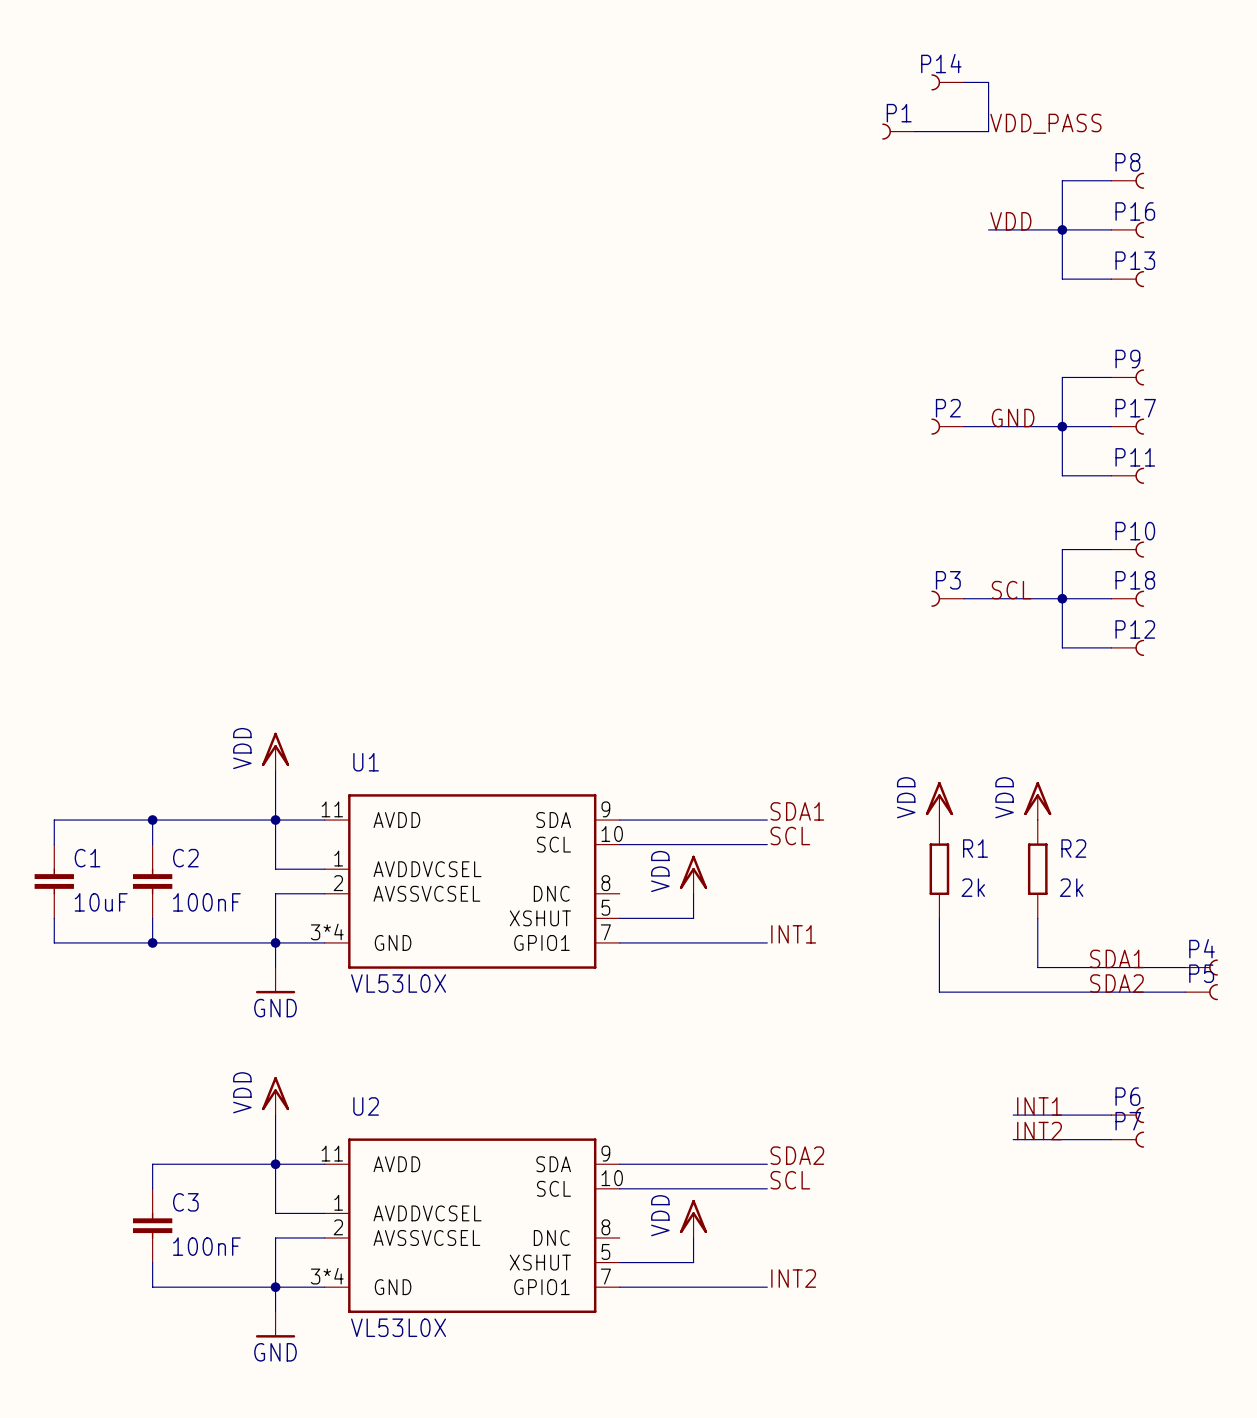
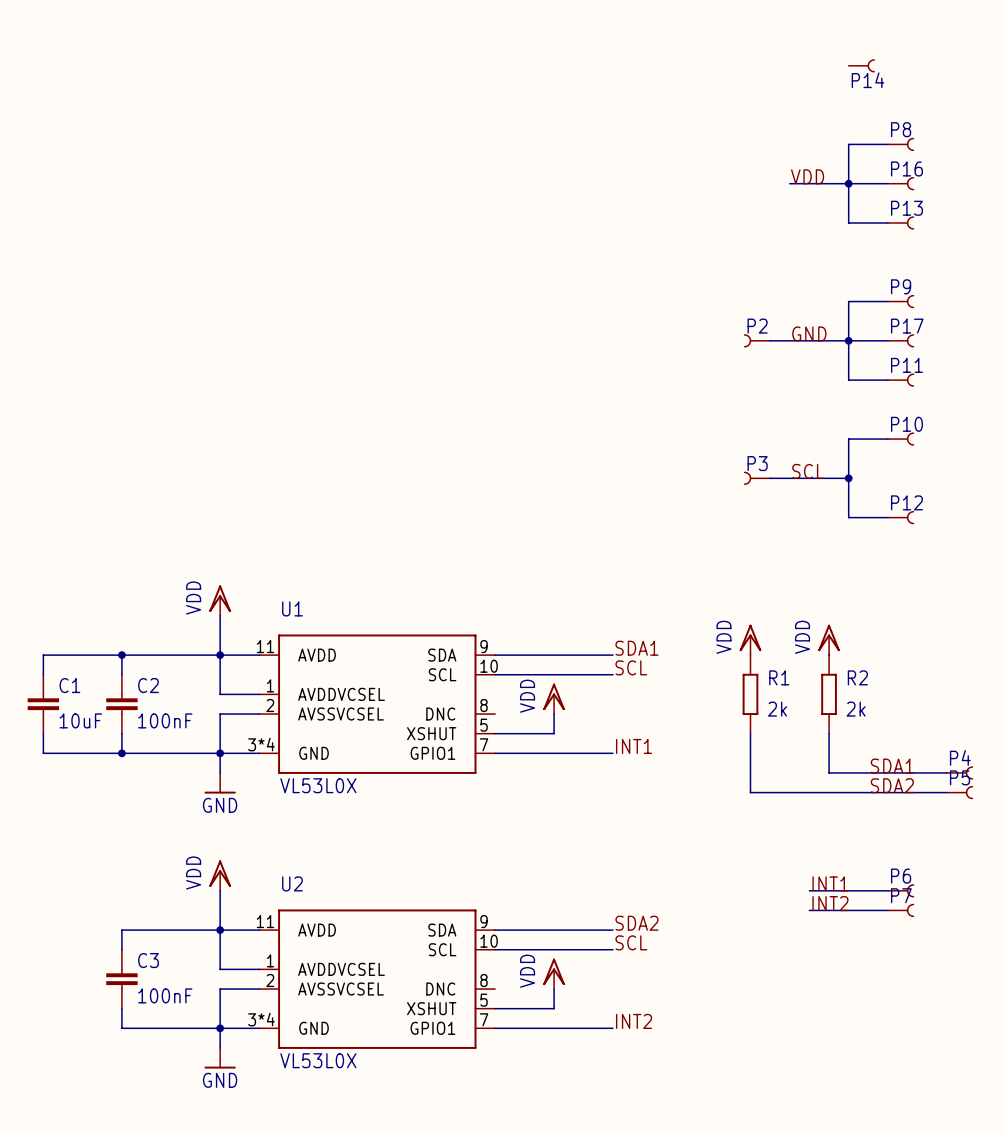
P14 rotation: 0° (935, 82) -> 180° (871, 65)
P14 position: (947, 82) -> (861, 65)
wire: (964, 82) (988, 82) (988, 131) (914, 131) -> none
label: VDD_PASS (1045, 123) -> none
P1: (898, 131) -> none
wire: (1062, 598) (1111, 598) -> none
P18: (1127, 598) -> none

